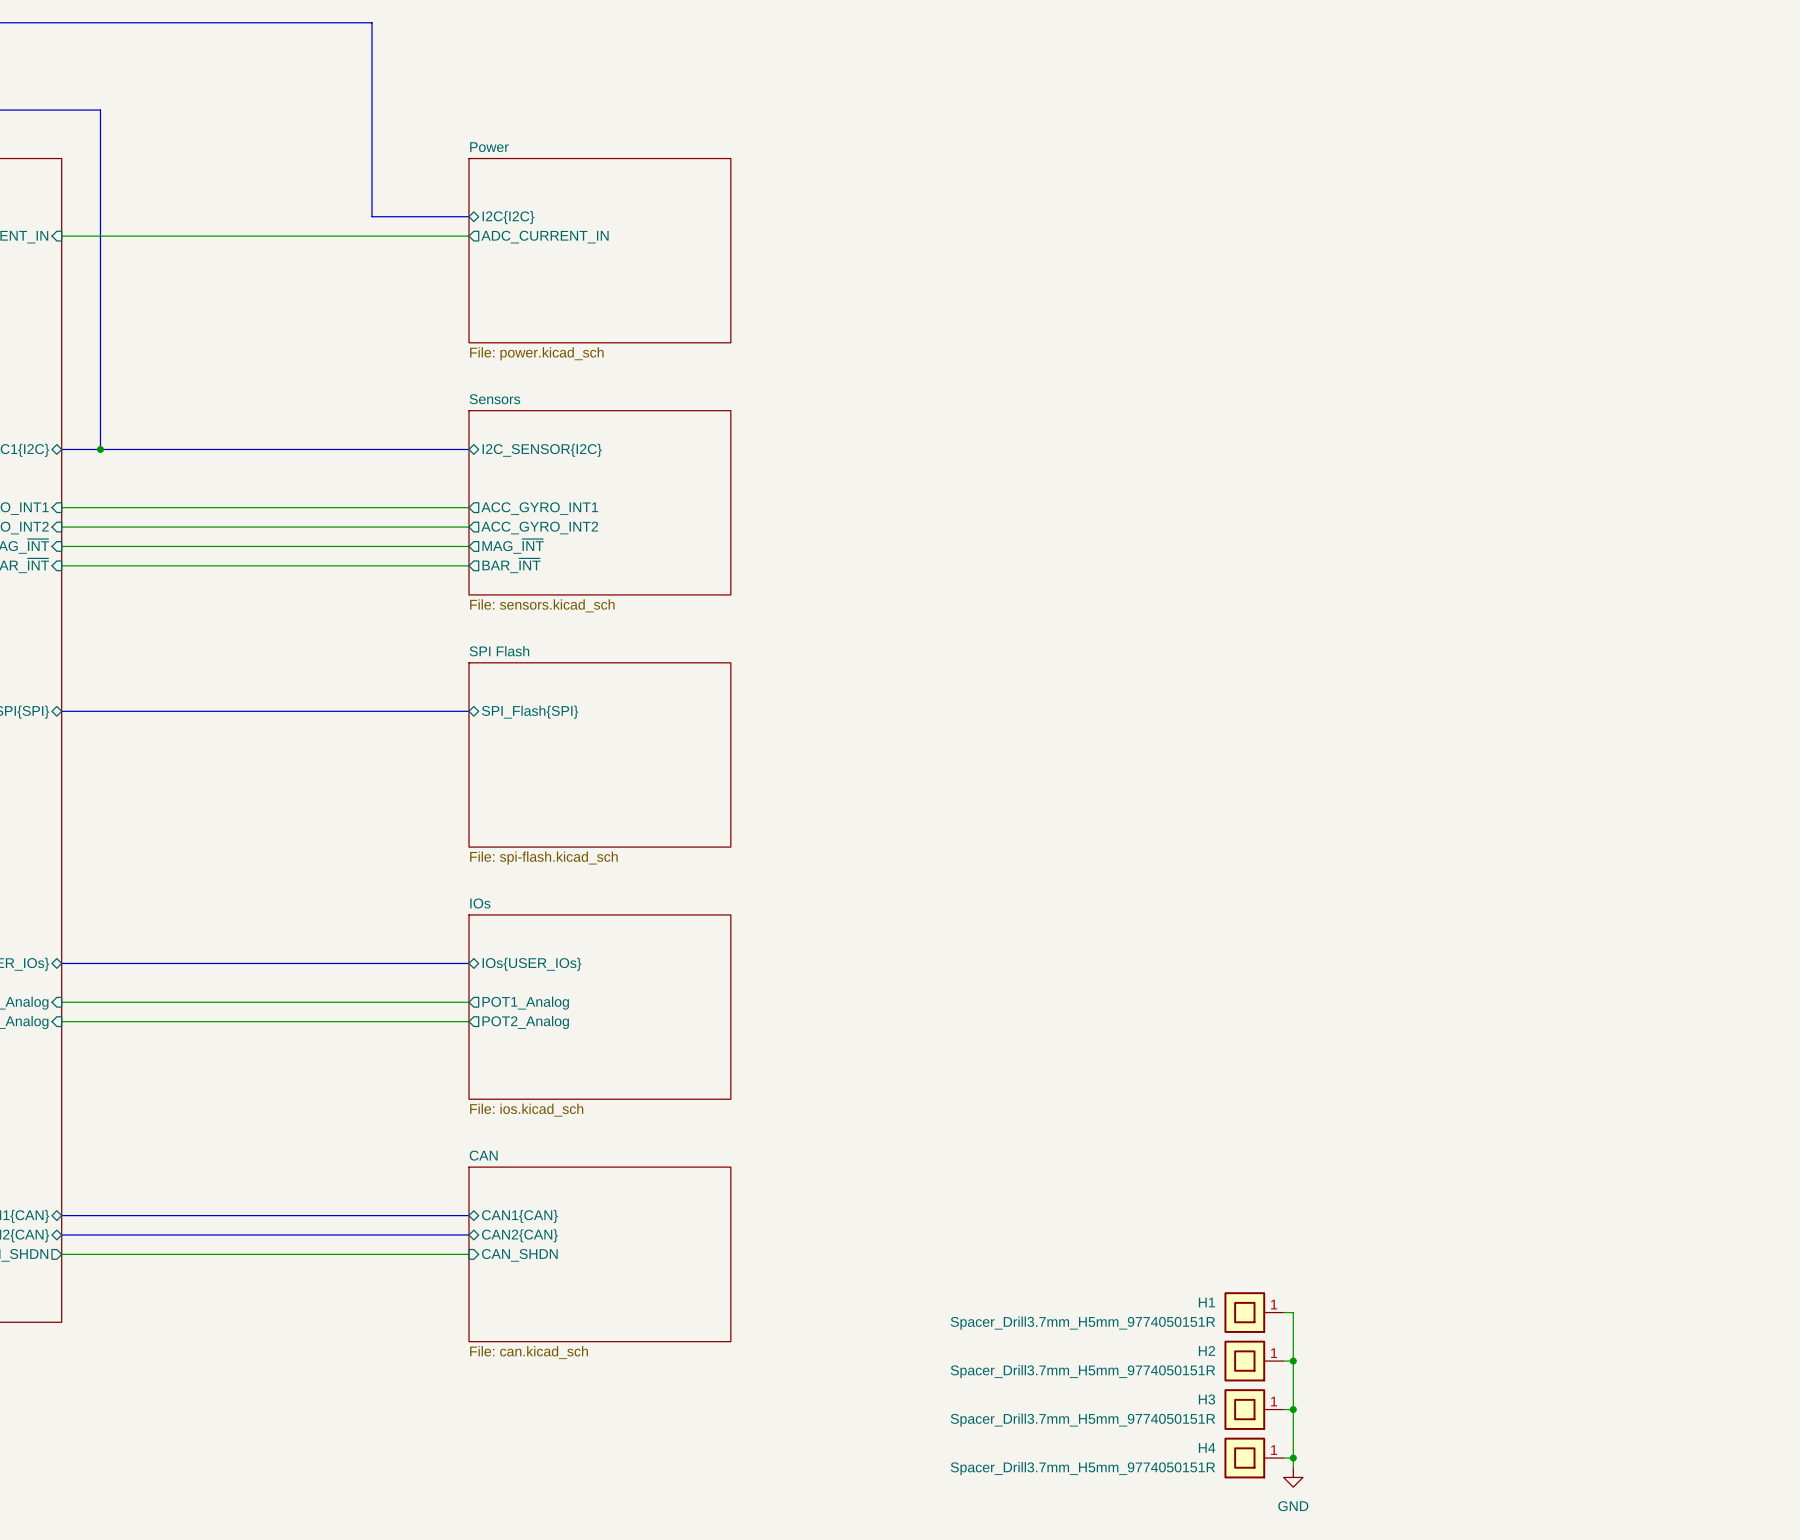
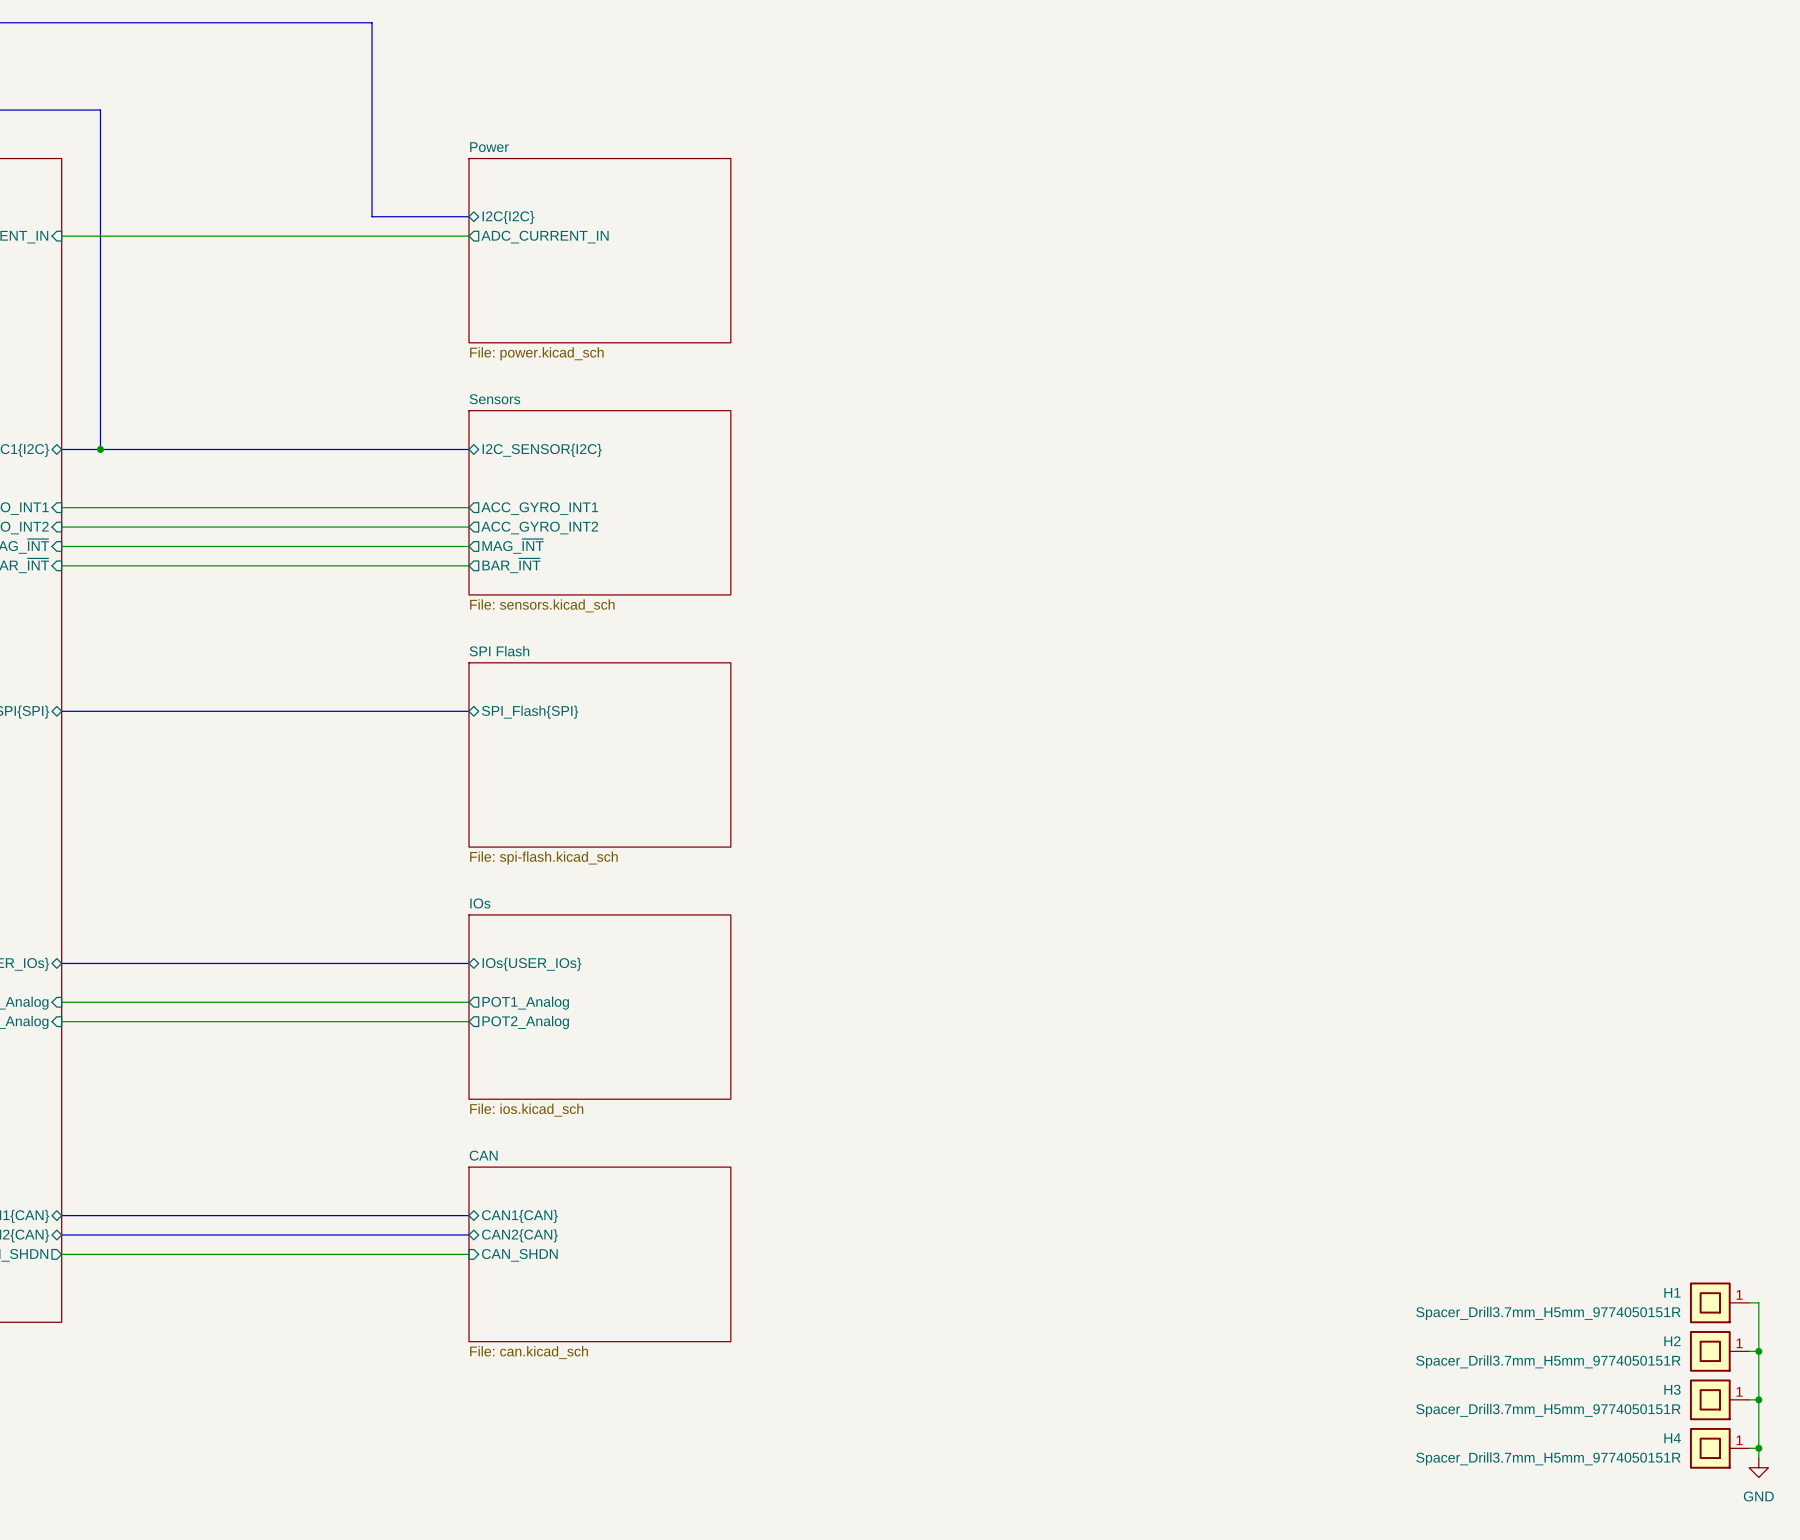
wire: none -> (1749, 1302) (1758, 1302) (1758, 1458)
H1 position: (1254, 1312) -> (1719, 1302)
wire: (1283, 1312) (1293, 1312) (1293, 1467) -> none
wire: none -> (1749, 1351) (1758, 1351)
junction: none -> (1758, 1351)
H2 position: (1254, 1361) -> (1719, 1351)
wire: (1283, 1361) (1293, 1361) -> none
junction: (1293, 1361) -> none
wire: none -> (1749, 1399) (1758, 1399)
junction: none -> (1758, 1399)
H3 position: (1254, 1409) -> (1719, 1399)
wire: (1283, 1409) (1293, 1409) -> none
junction: (1293, 1409) -> none
wire: none -> (1749, 1448) (1758, 1448)
junction: none -> (1758, 1448)
H4 position: (1254, 1458) -> (1719, 1448)
wire: (1283, 1458) (1293, 1458) -> none
junction: (1293, 1458) -> none
power symbol: none -> GND (1758, 1467)
power symbol: GND (1293, 1477) -> none

